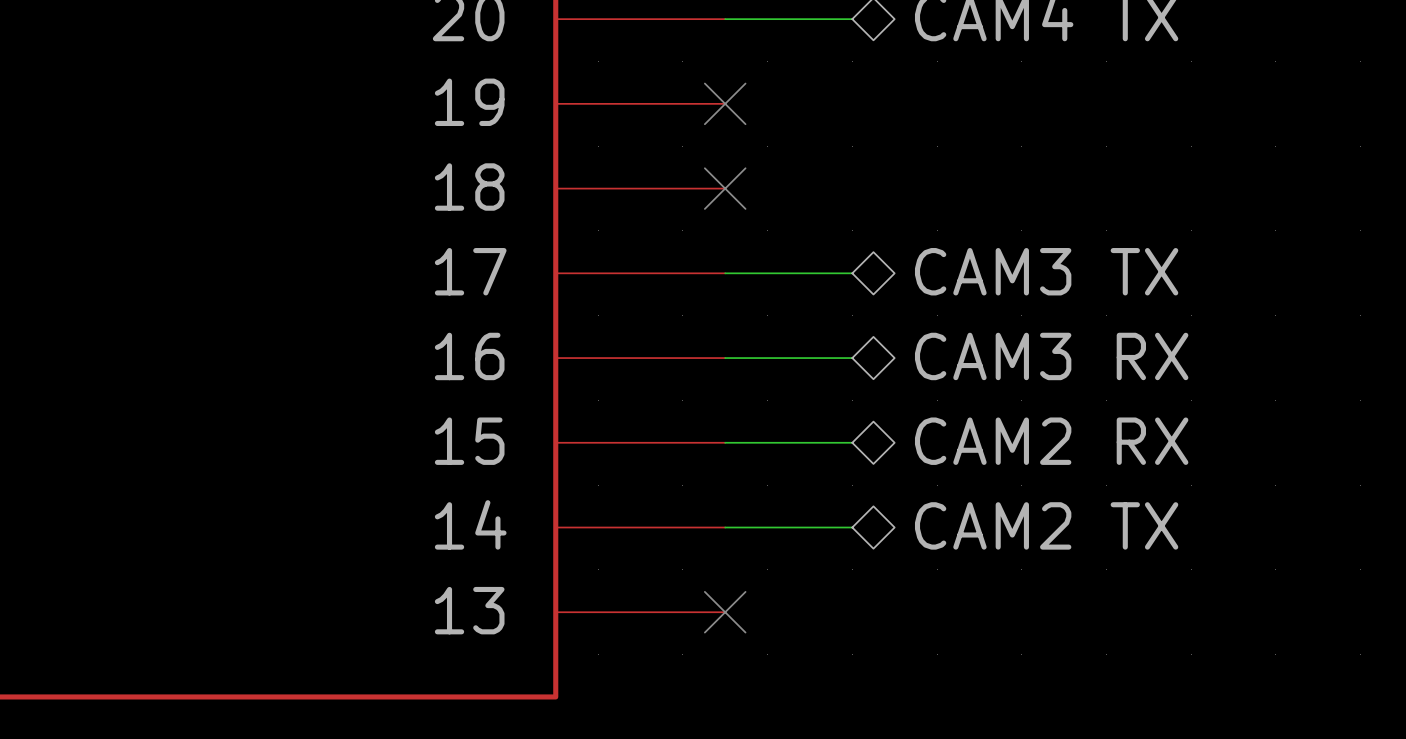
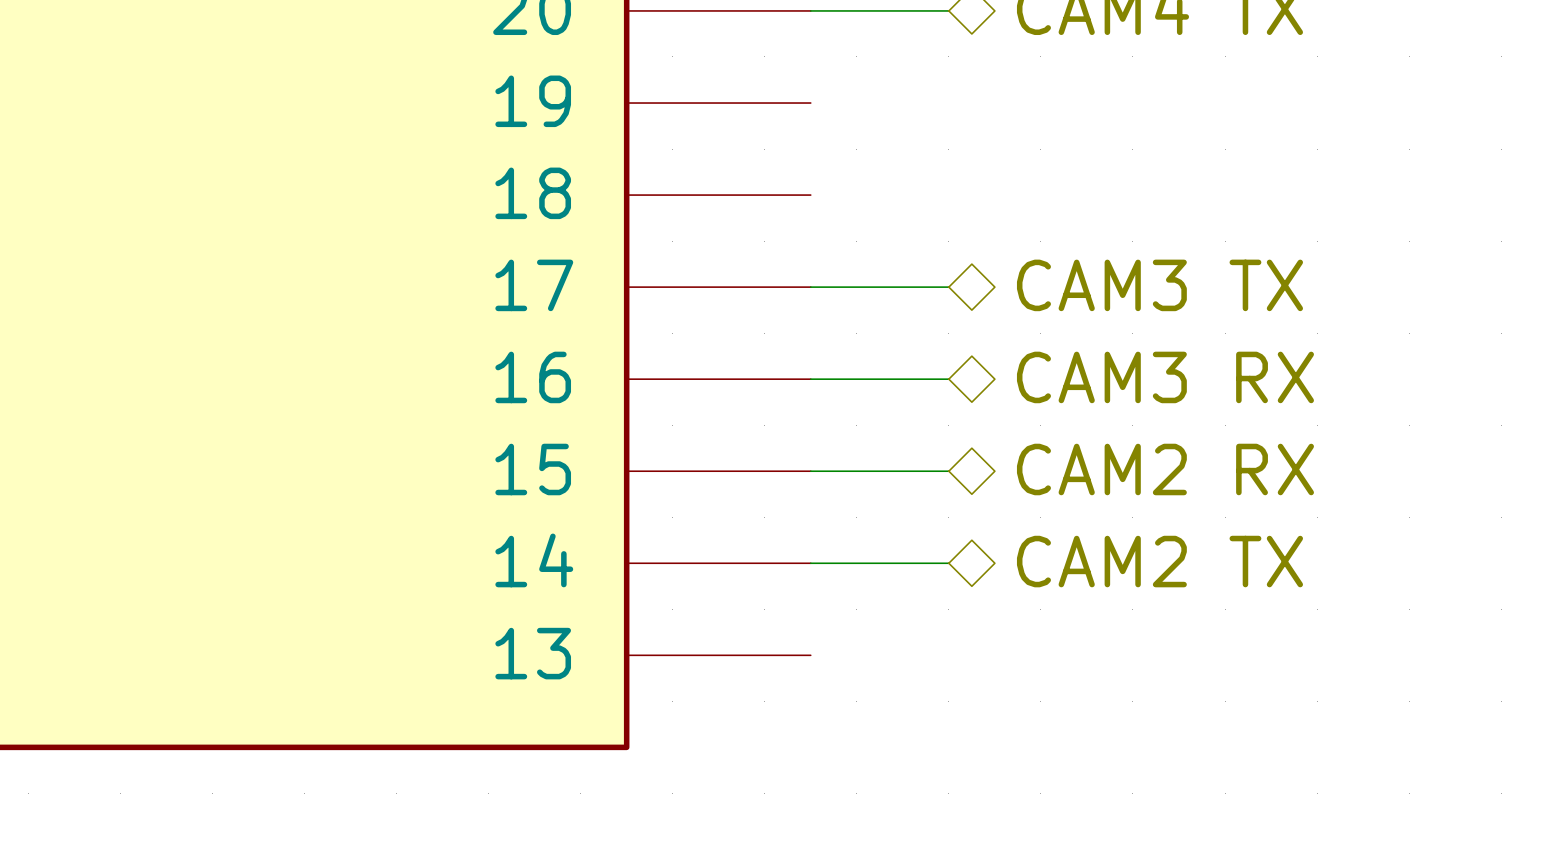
no-connect mark: (725, 103) -> none
no-connect mark: (725, 188) -> none
no-connect mark: (725, 612) -> none

